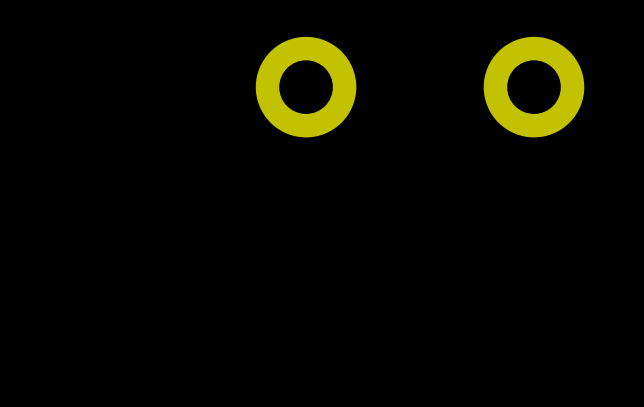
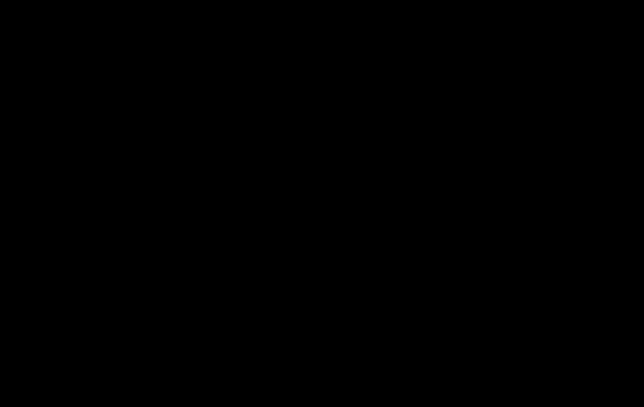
part: (420, 87) -> none

